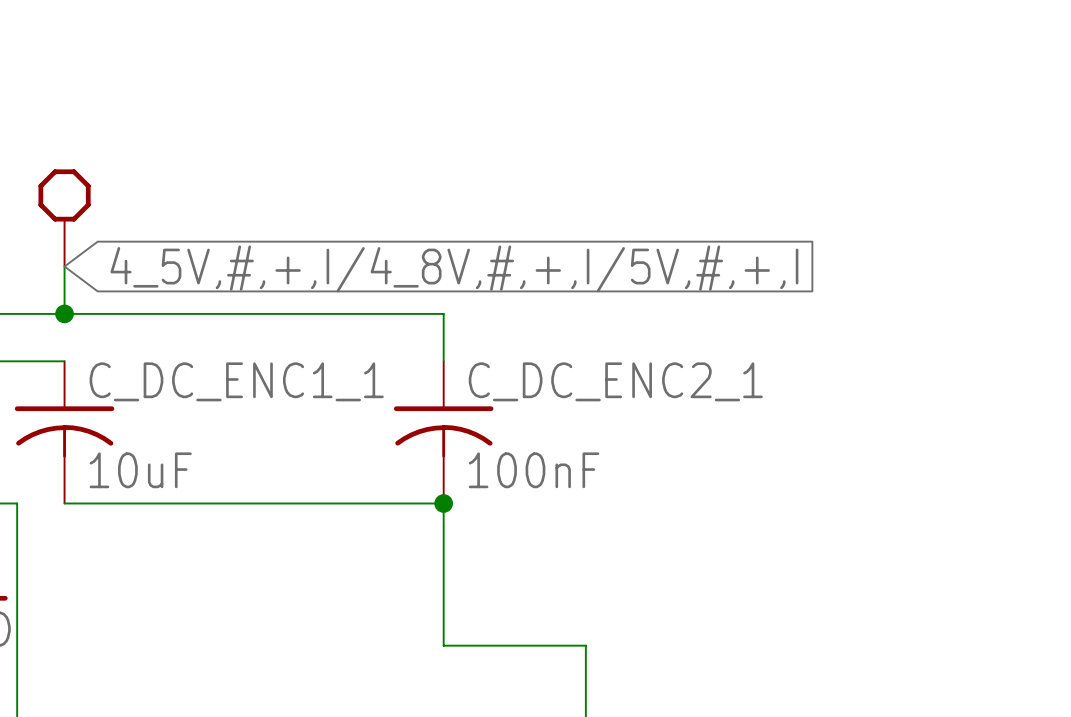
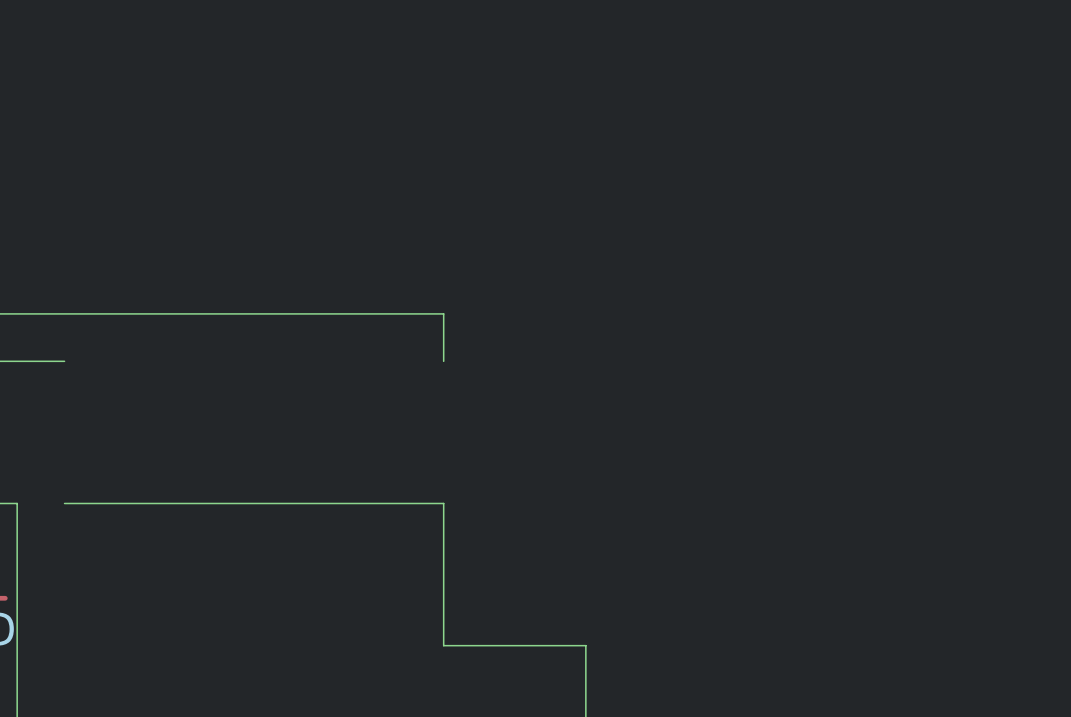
power symbol: (64, 217) -> none
wire: (64, 266) (64, 313) -> none
global label: 4_5V,#,+,I/4_8V,#,+,I/5V,#,+,I (454, 268) -> none
junction: (64, 313) -> none
C_DC_ENC1_1: 10uF (64, 432) -> none
C_DC_ENC2_1: 100nF (443, 432) -> none
junction: (443, 503) -> none

